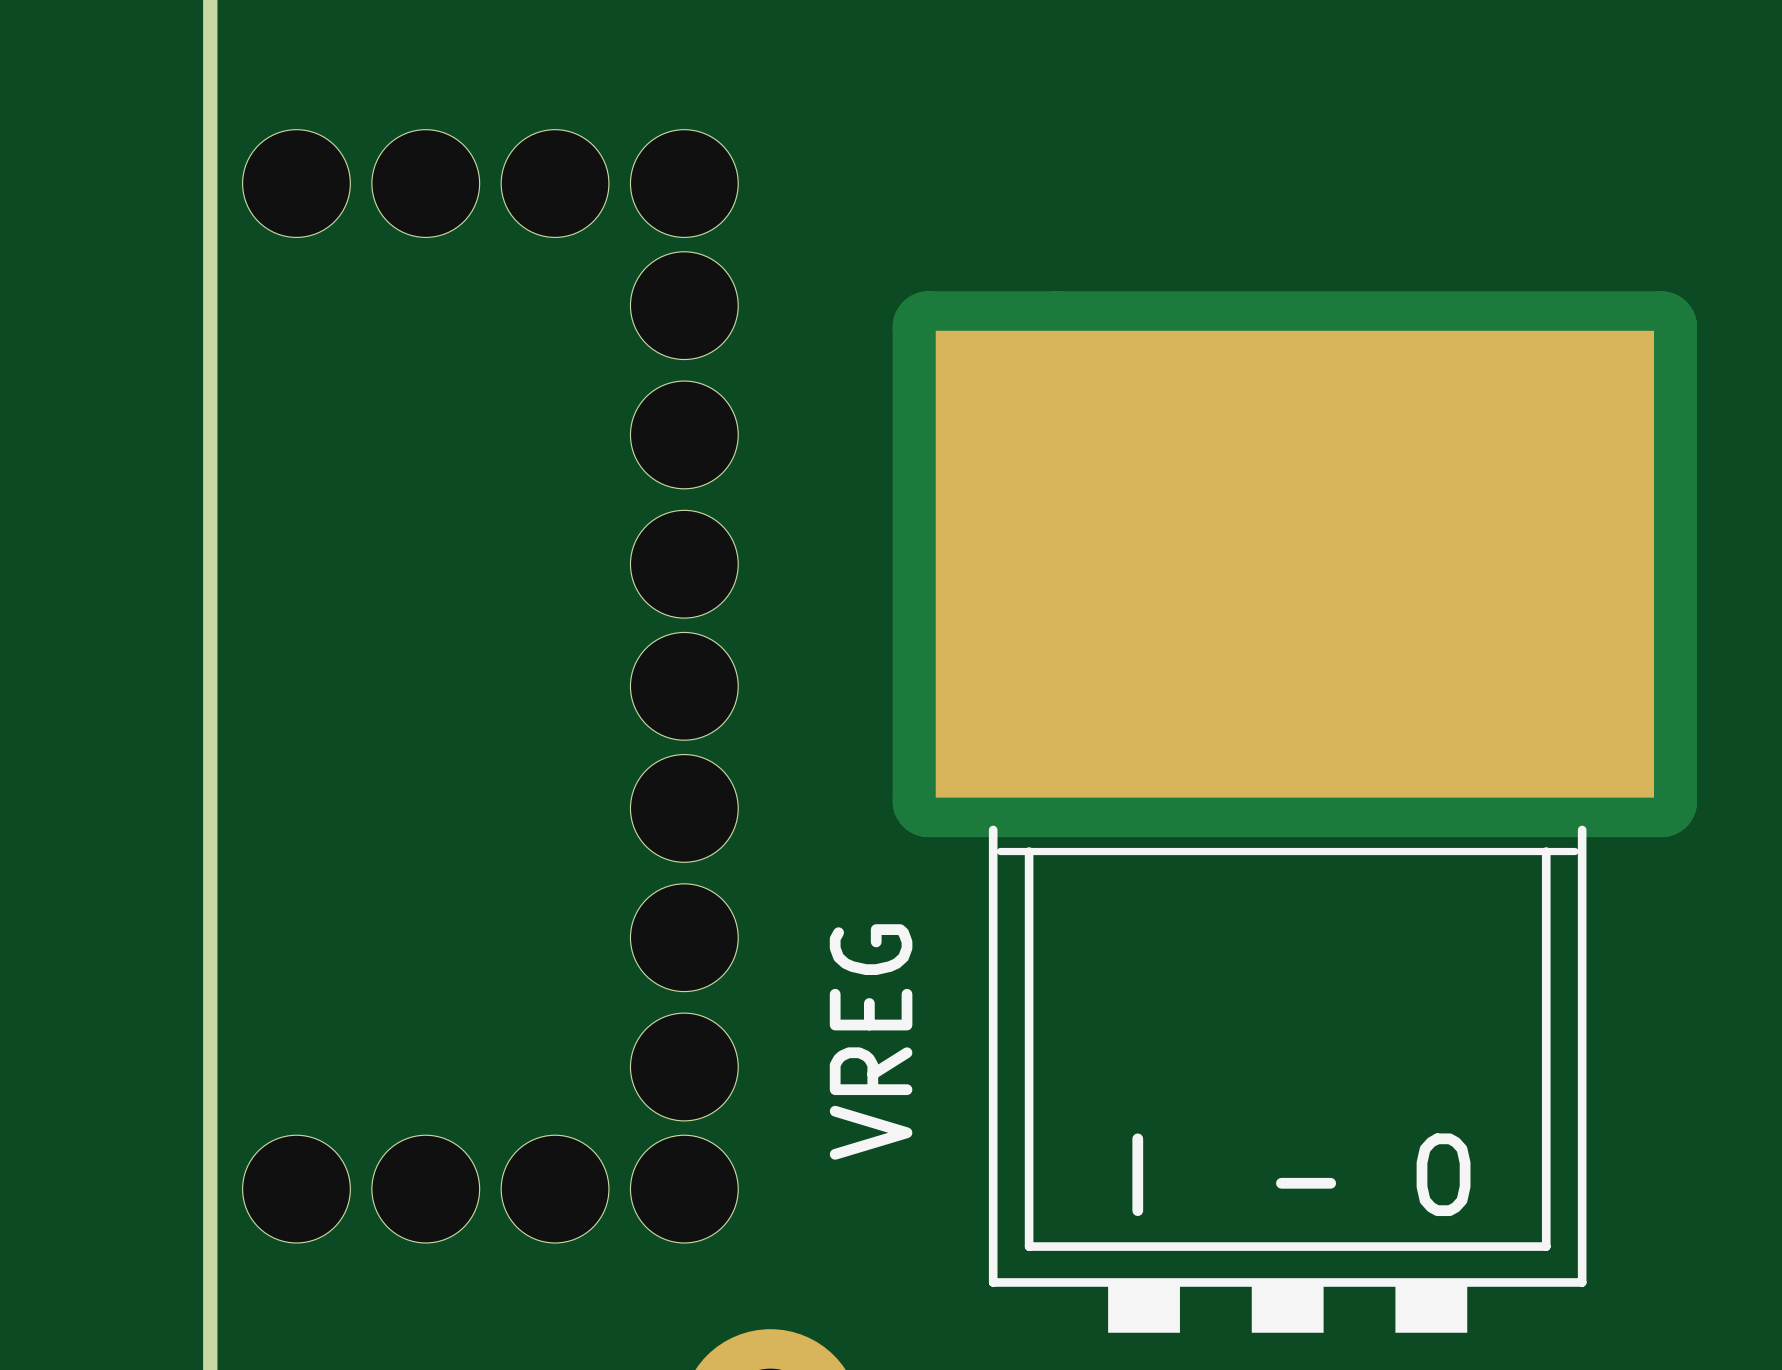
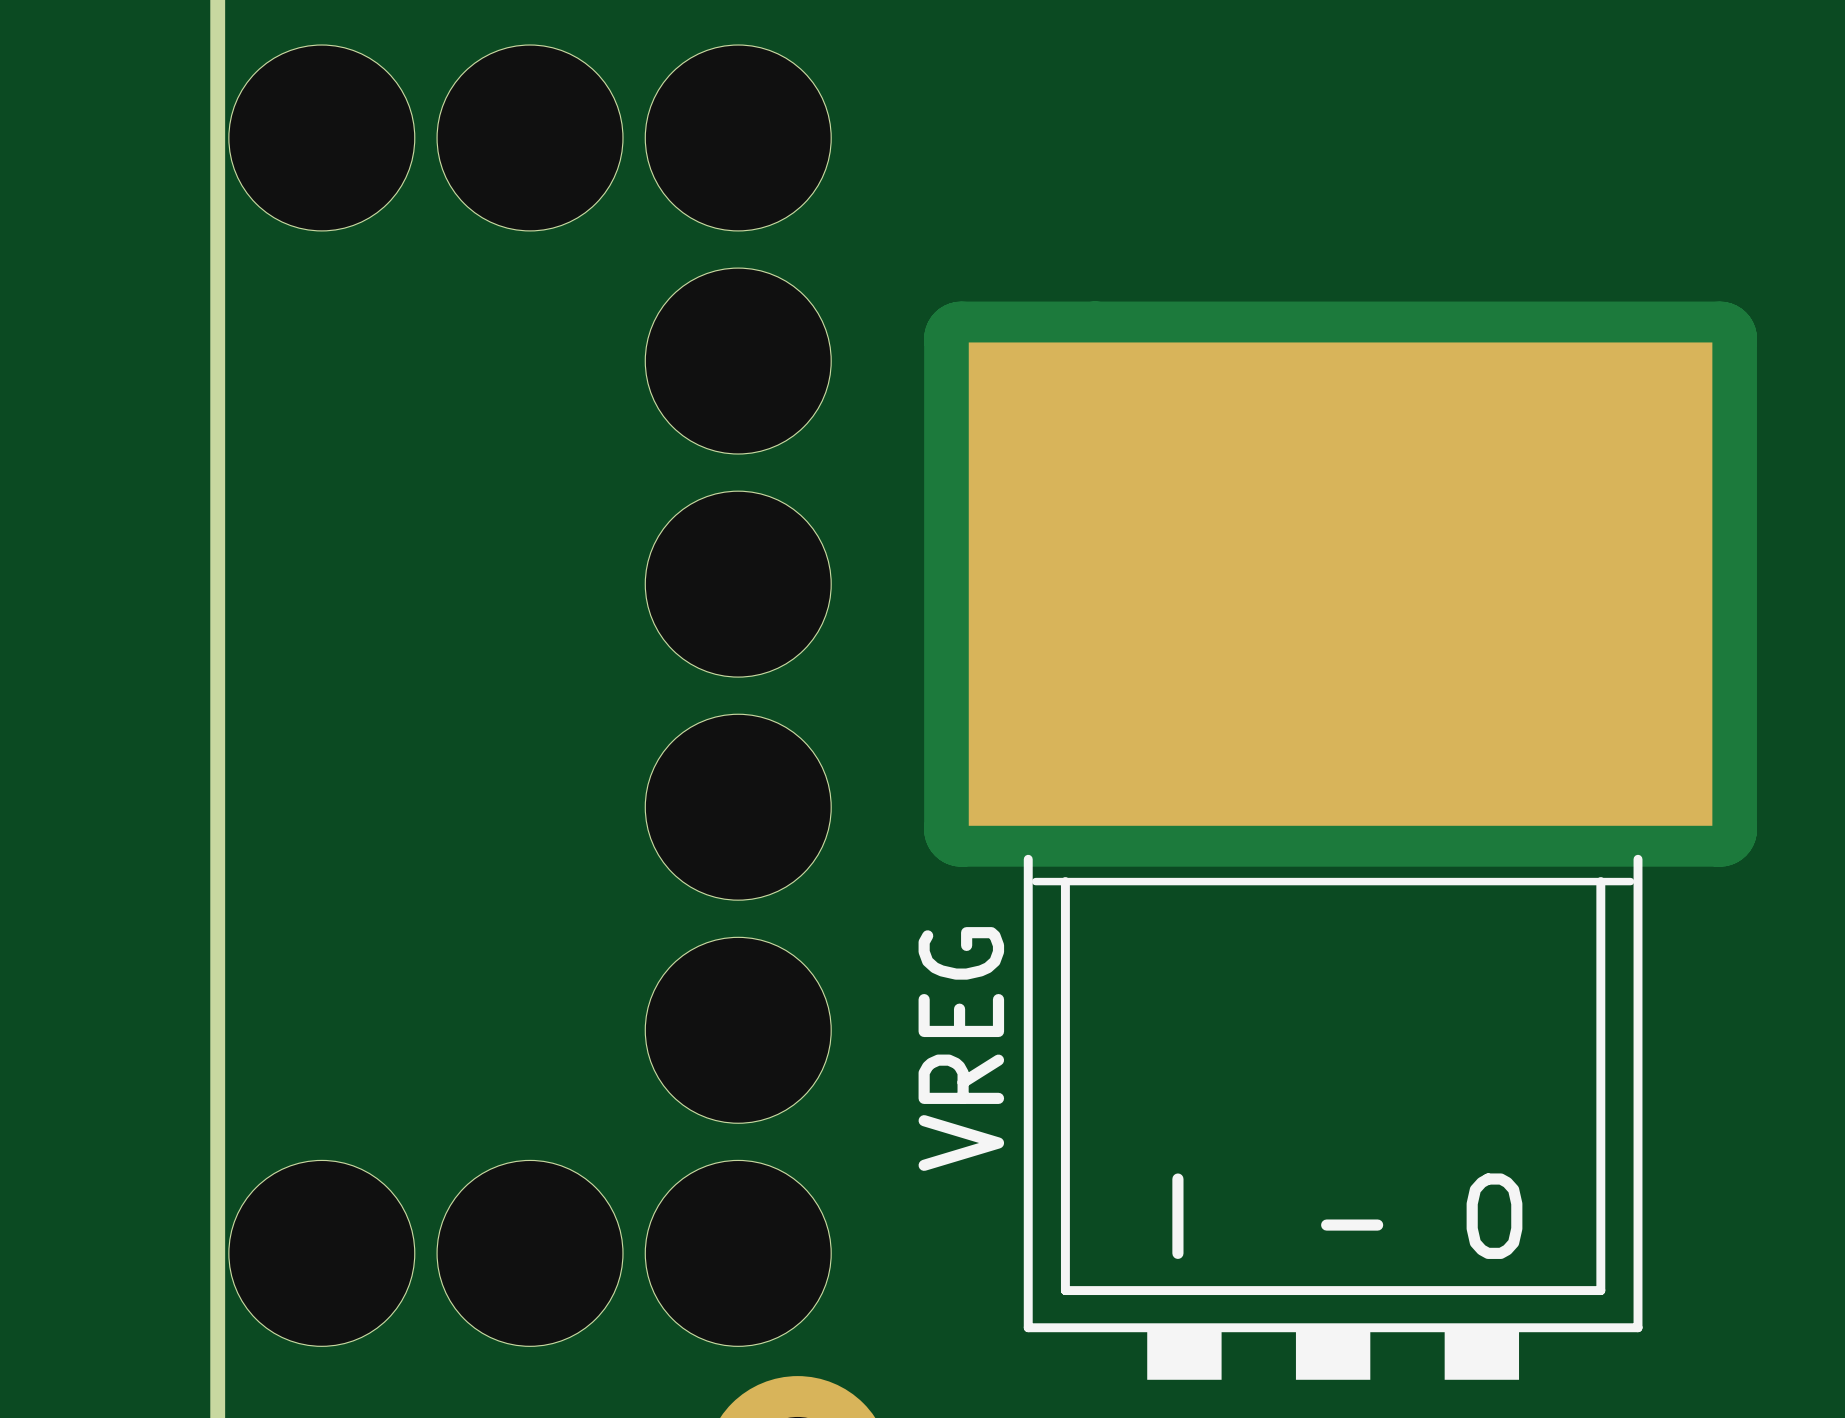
hole size: [242, 129, 351, 238] -> [228, 45, 415, 231]
hole: none -> (530, 137)
hole: none -> (738, 137)
hole: (425, 183) -> none
hole: (555, 183) -> none
hole: (684, 183) -> none
hole: (684, 305) -> none
hole: none -> (738, 361)
hole: (684, 434) -> none
hole size: [630, 510, 739, 619] -> [645, 491, 832, 678]
hole: (684, 686) -> none
hole size: [630, 754, 739, 863] -> [645, 714, 832, 901]
hole: (684, 937) -> none
hole: none -> (738, 1030)
VREG name position: VREG (871, 1041) -> VREG (961, 1048)
hole: (684, 1067) -> none
hole size: [242, 1135, 351, 1243] -> [228, 1160, 415, 1347]
hole size: [630, 1135, 739, 1243] -> [645, 1160, 832, 1347]
hole: (425, 1189) -> none
hole: (555, 1189) -> none
hole: none -> (530, 1253)

